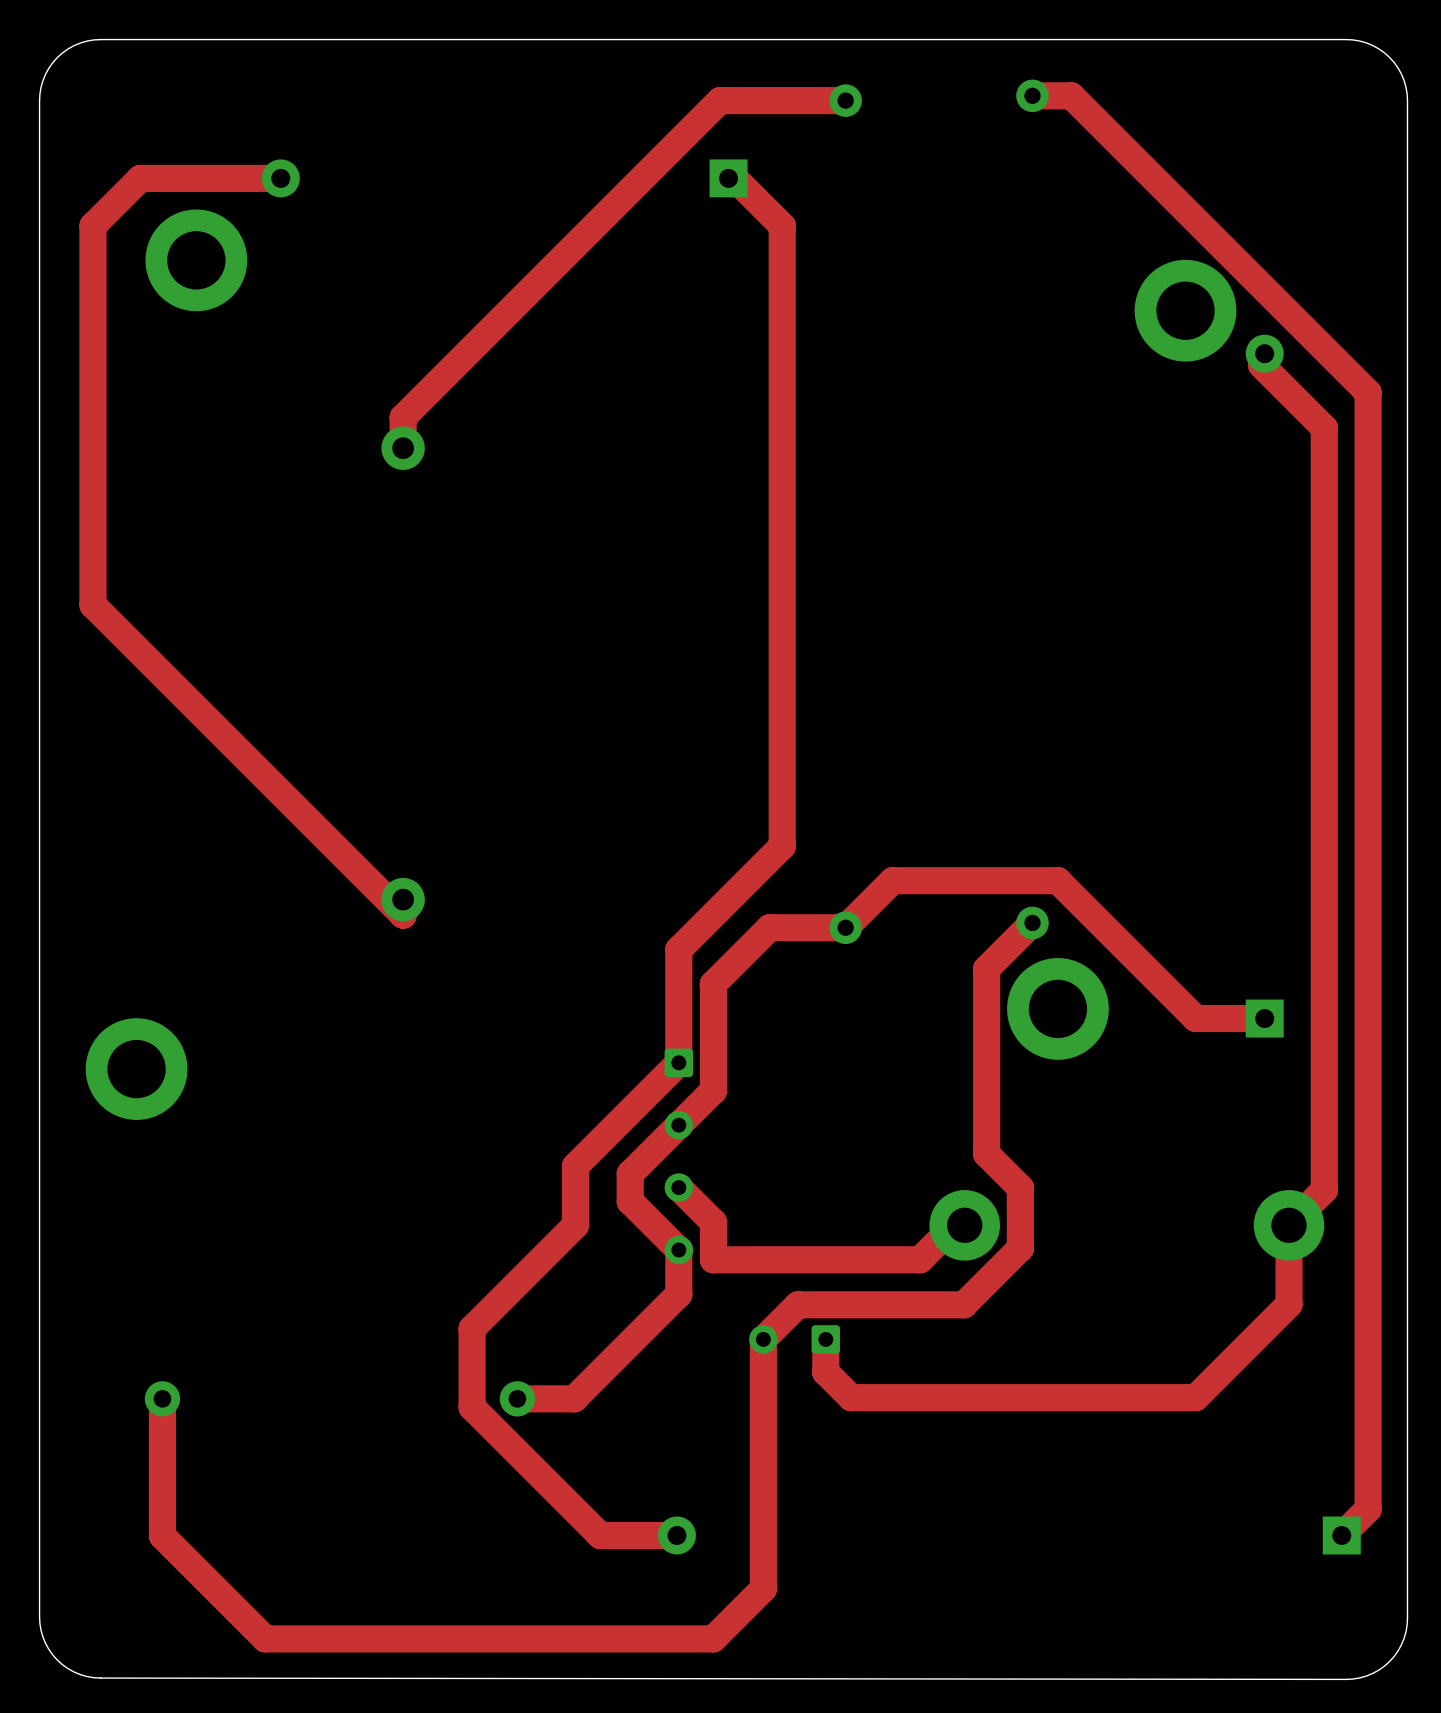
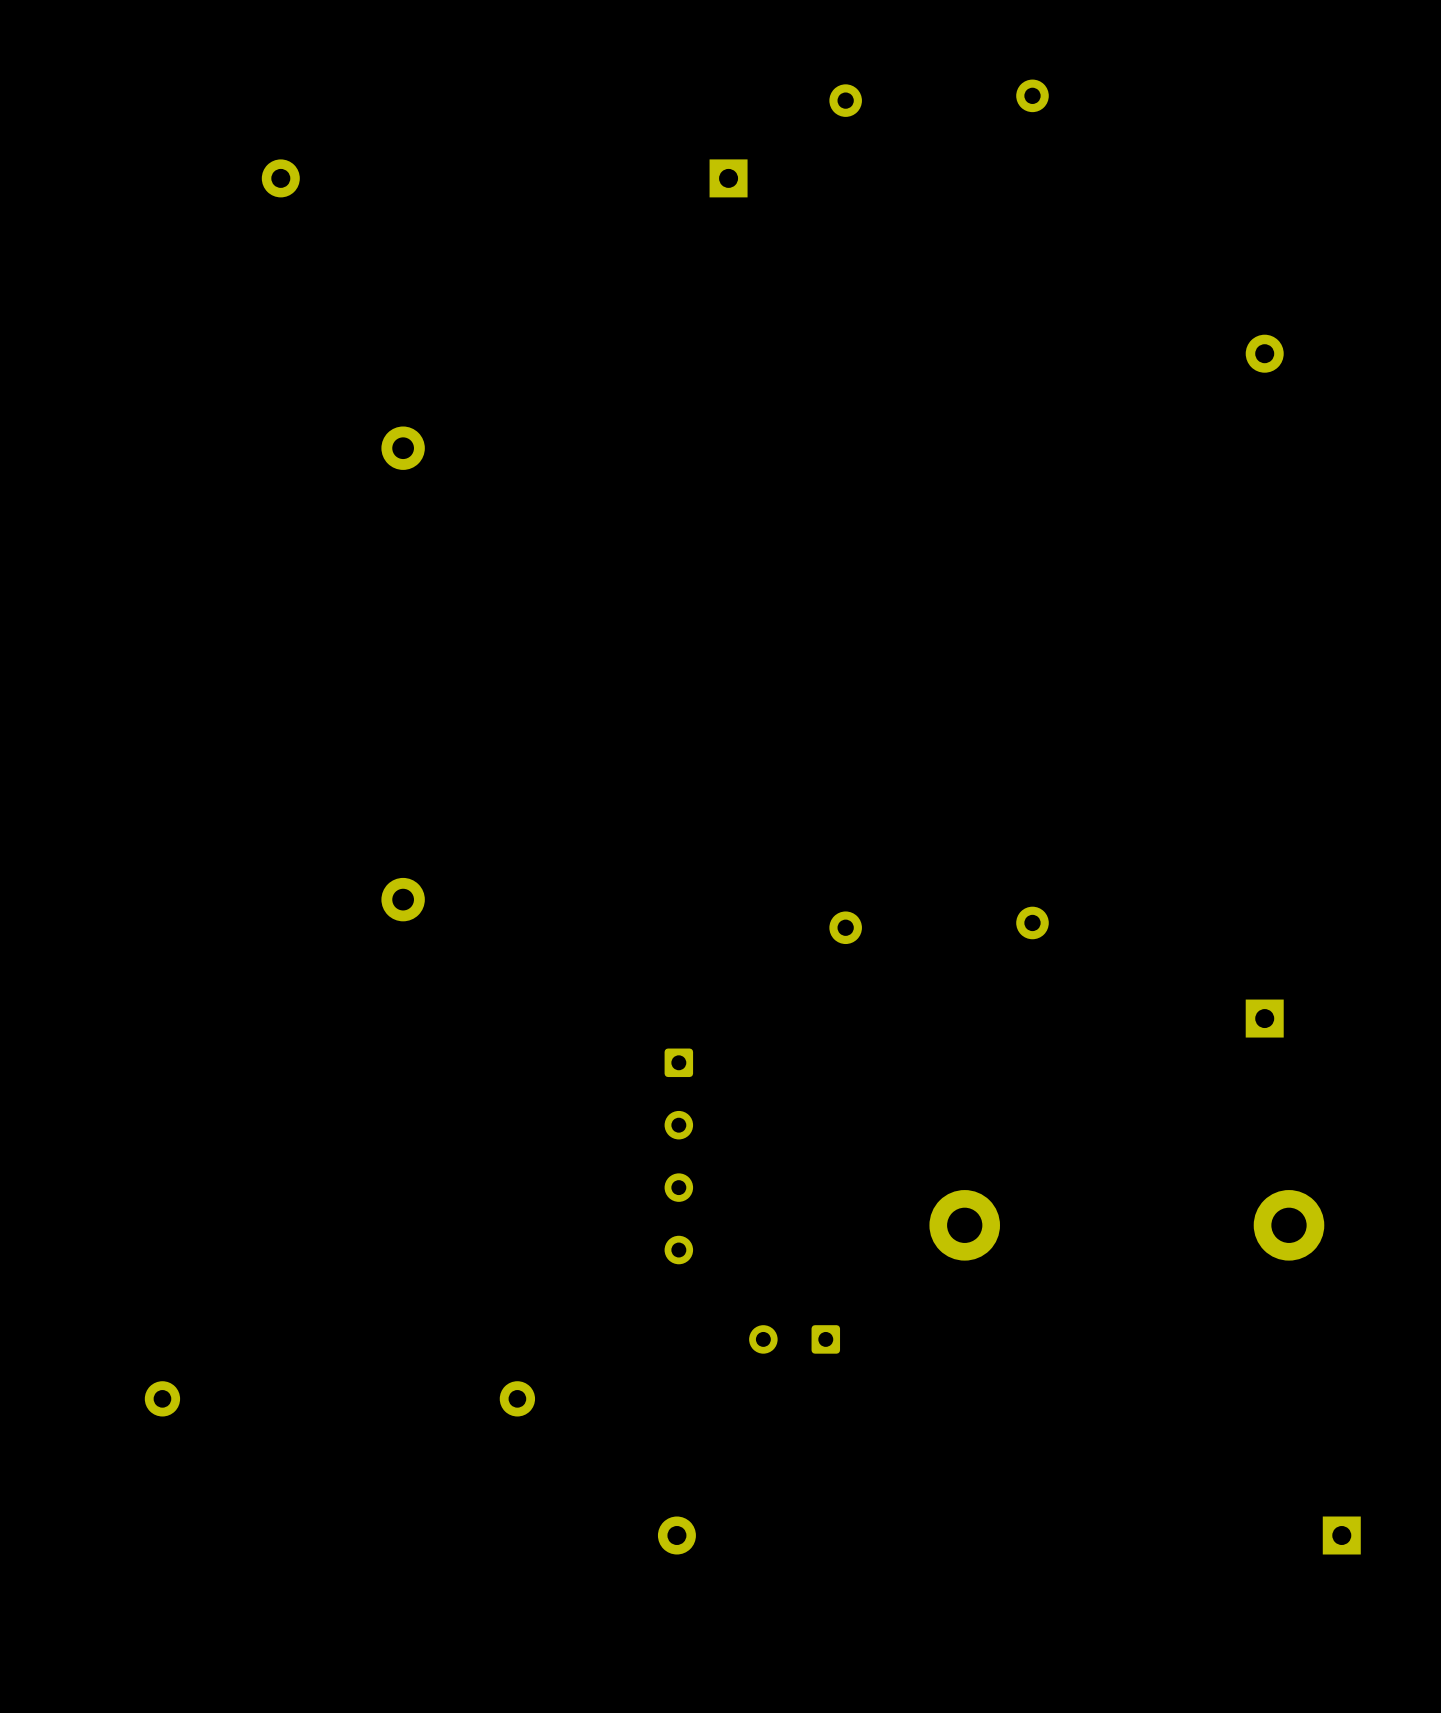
board edge: (1346, 39) (100, 39) (87, 41) (74, 45) (62, 52) (52, 62) (42, 80) (39, 100) (39, 1617) (41, 1630) (45, 1643) (52, 1655) (62, 1664) (80, 1674) (100, 1678) (1346, 1679) (1360, 1677) (1372, 1673) (1384, 1666) (1394, 1656) (1404, 1638) (1407, 1618) (1407, 100) (1404, 80) (1398, 68) (1389, 57) (1378, 48) (1366, 42) (1346, 39) -> none
top track: (1032, 95) (1071, 95) (1368, 392) (1368, 1509) (1341, 1535) -> none
top track: (845, 100) (720, 100) (403, 417) (403, 448) -> none
top track: (280, 178) (140, 178) (92, 225) (92, 604) (403, 915) (403, 899) -> none
top track: (728, 178) (734, 178) (782, 225) (782, 846) (678, 949) (678, 1062) (575, 1166) (575, 1225) (472, 1328) (472, 1407) (600, 1535) (676, 1535) -> none
part: (196, 260) -> none
part: (1185, 310) -> none
top track: (1261, 364) (1324, 427) (1324, 1190) (1289, 1225) (1289, 1304) (1195, 1397) (851, 1397) (825, 1372) (825, 1339) -> none
top track: (1032, 922) (986, 968) (986, 1154) (1020, 1187) (1020, 1248) (963, 1304) (797, 1304) (763, 1339) (763, 1588) (713, 1638) (265, 1638) (162, 1536) (162, 1398) -> none
top track: (713, 984) (769, 927) (845, 927) (892, 880) (1057, 880) (1195, 1018) (1264, 1018) -> none
top track: (713, 984) (713, 1090) (630, 1173) (630, 1201) (678, 1250) (678, 1294) (574, 1398) (517, 1398) -> none
part: (1057, 1008) -> none
part: (136, 1069) -> none
top track: (678, 1187) (713, 1222) (713, 1259) (920, 1259) (954, 1225) (964, 1225) -> none

